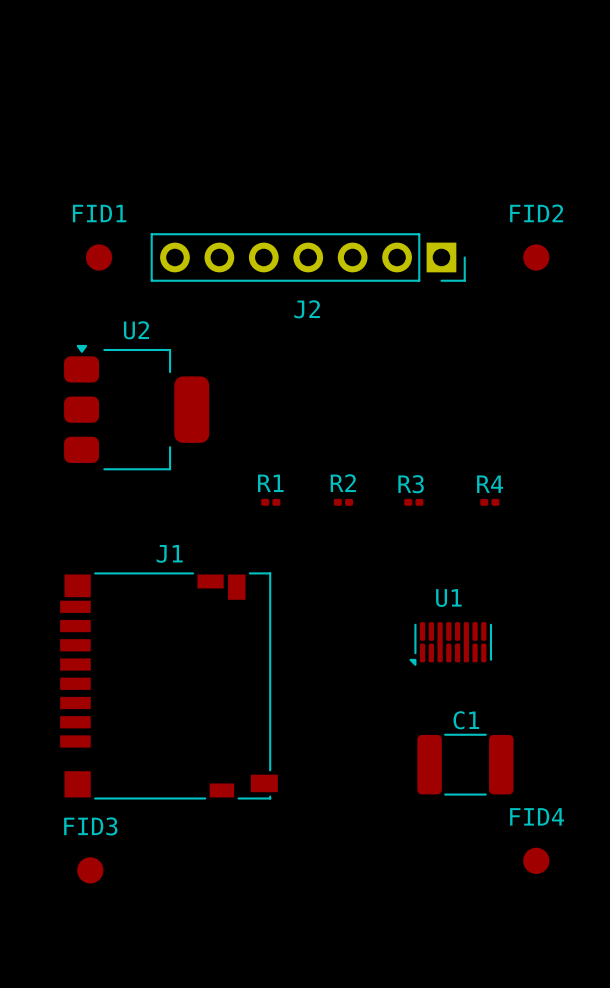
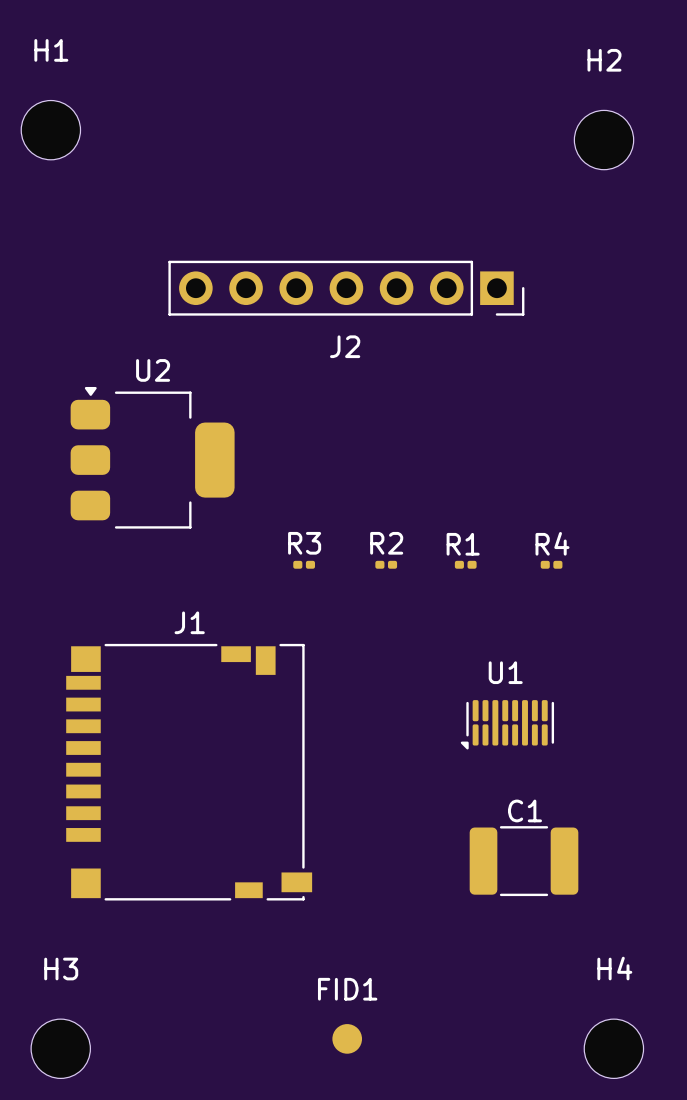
H1: none -> (50, 130)
H2: none -> (604, 140)
FID1 position: (99, 257) -> (347, 1038)
FID2: (536, 257) -> none
R1 name: R1 (270, 483) -> R3 (304, 543)
R3 name: R3 (411, 484) -> R1 (463, 544)
FID4: (536, 860) -> none
FID3: (90, 870) -> none
H3: none -> (60, 1048)
H4: none -> (613, 1048)

